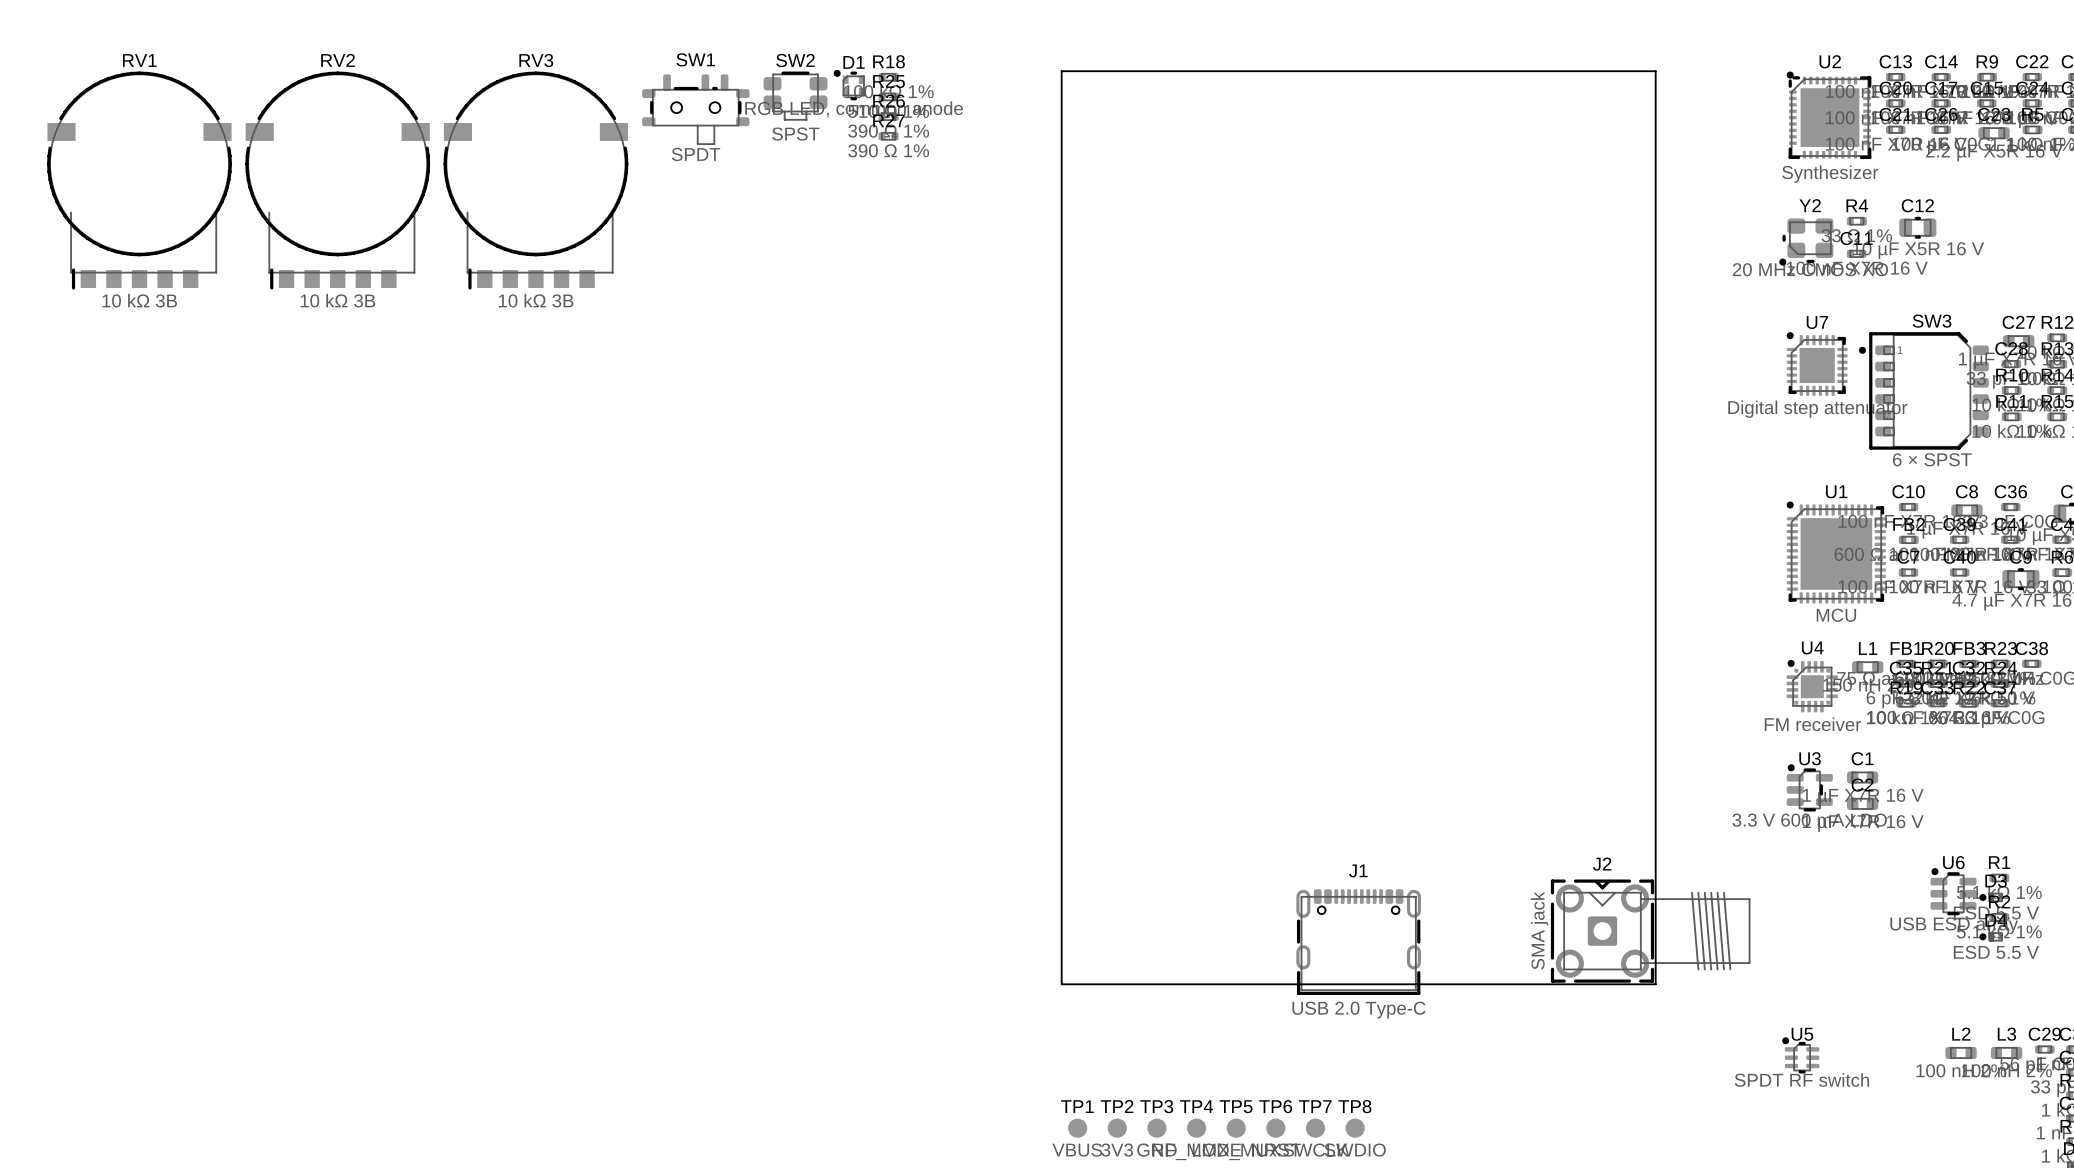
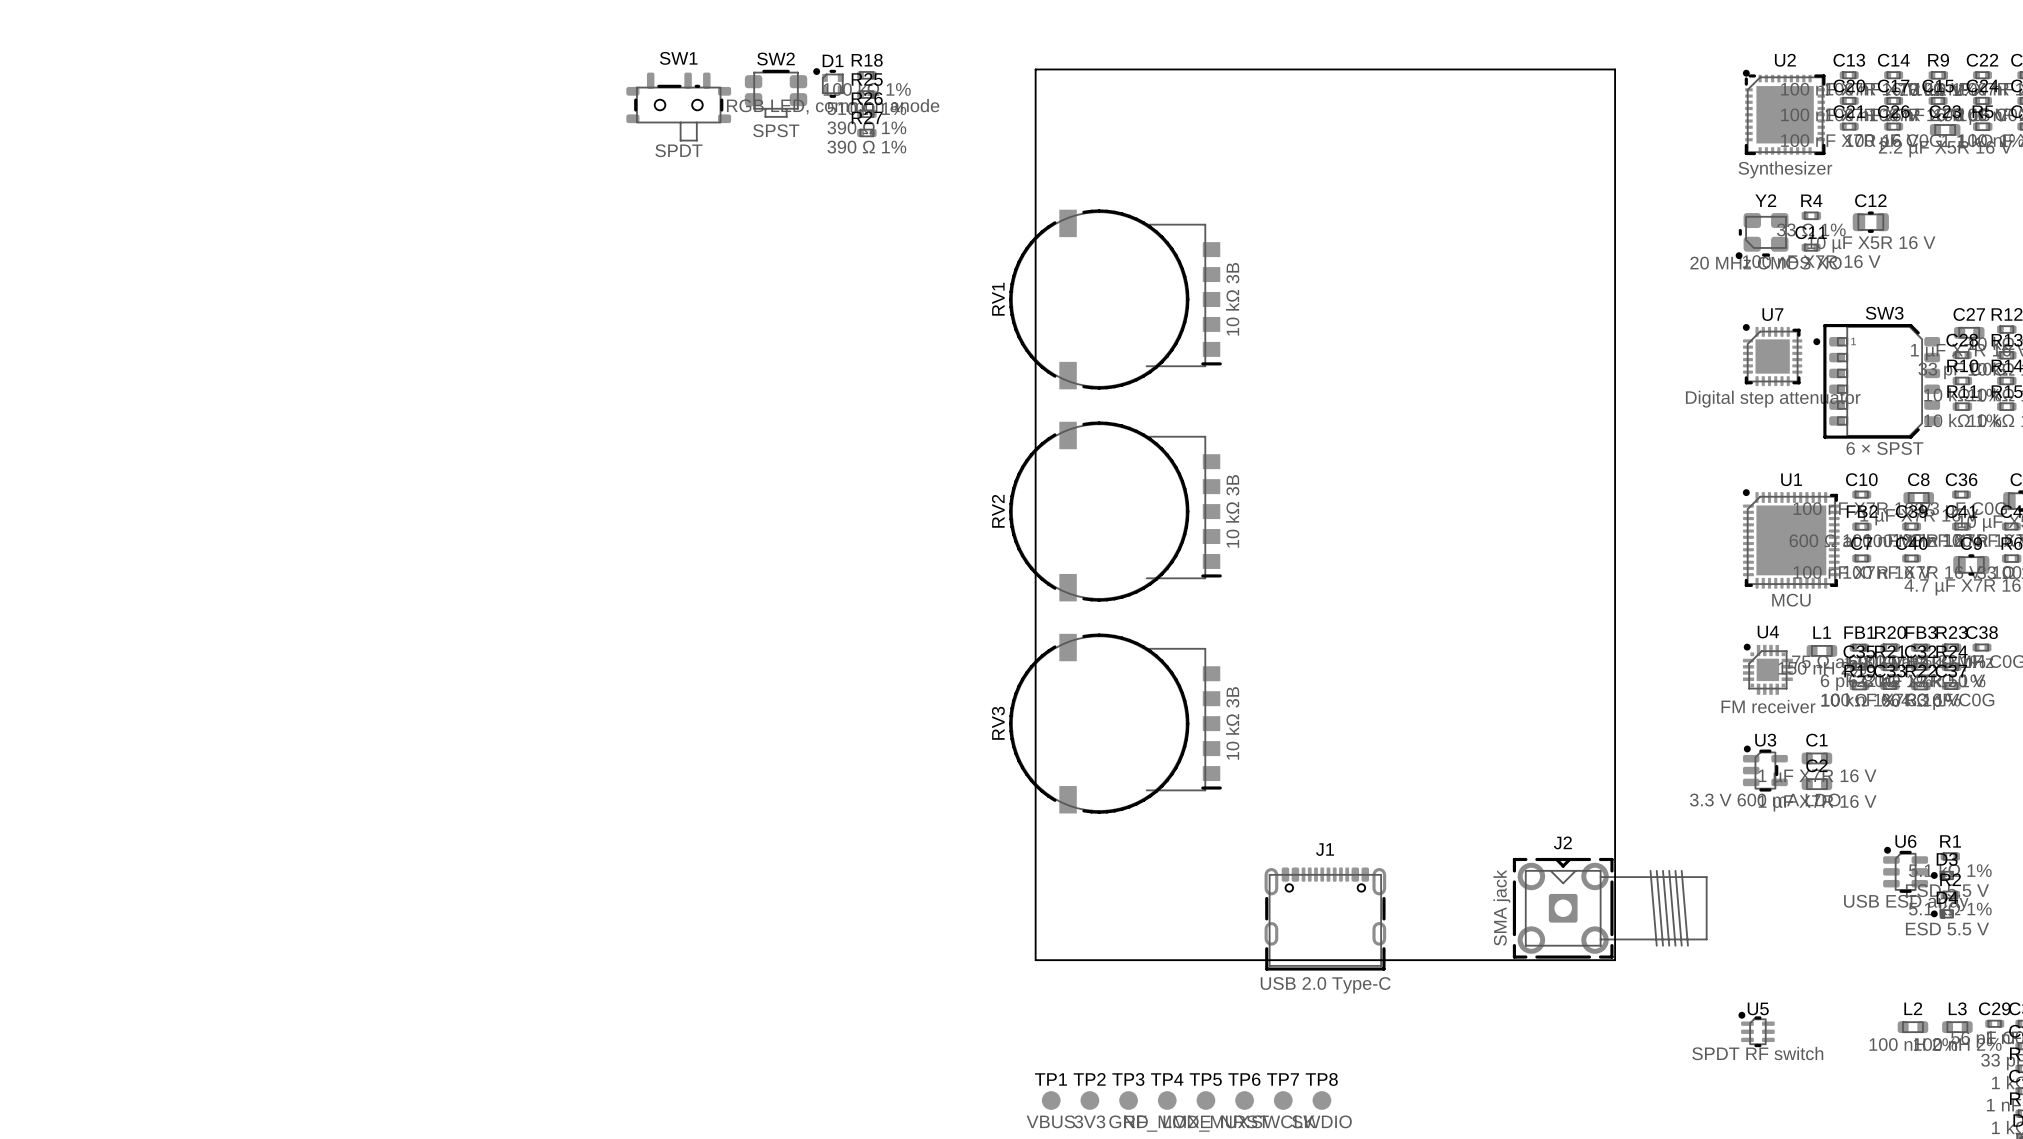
RV1 rotation: 0° (139, 180) -> 90° counterclockwise (1115, 299)
RV1 position: (139, 180) -> (1115, 299)
RV2 rotation: 0° (337, 180) -> 90° counterclockwise (1115, 511)
RV2 position: (337, 180) -> (1115, 511)
RV3 rotation: 0° (535, 180) -> 90° counterclockwise (1115, 723)
RV3 position: (535, 180) -> (1115, 723)

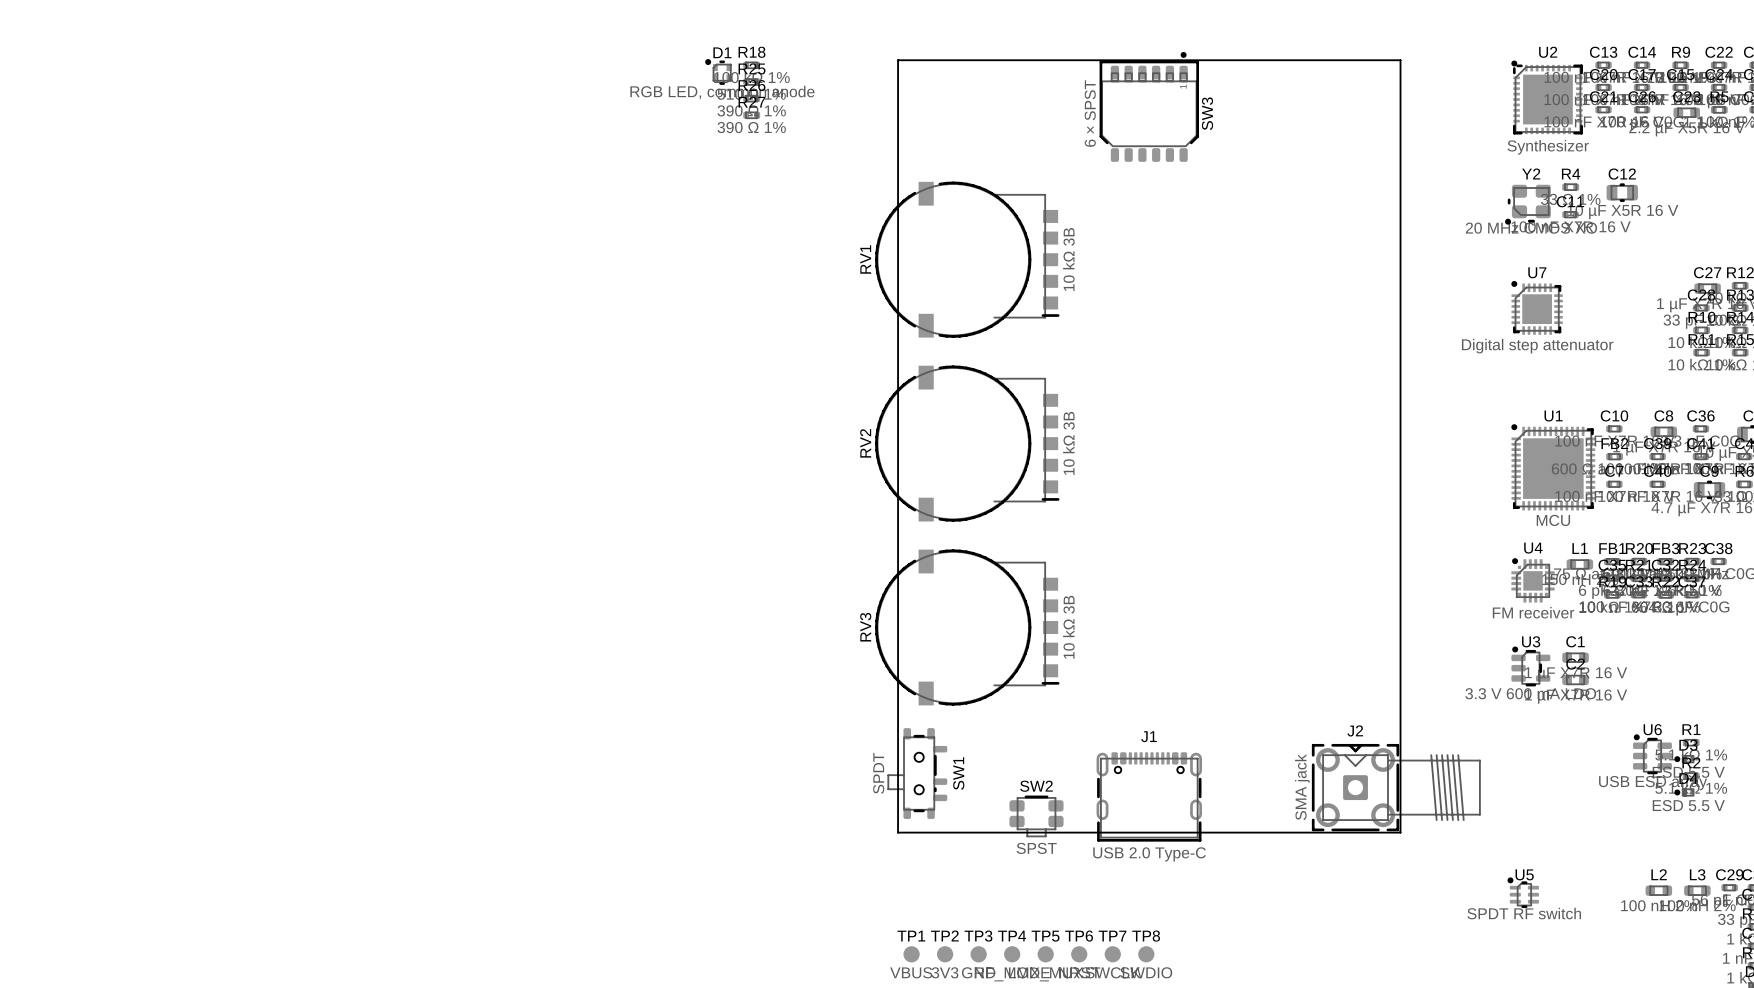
SW2 position: (776, 93) -> (1036, 816)
SW1 rotation: 0° (678, 106) -> 90° clockwise (917, 773)
SW1 position: (678, 106) -> (917, 773)
SW3 rotation: 0° (1876, 381) -> 90° clockwise (1149, 106)
SW3 position: (1876, 381) -> (1149, 106)

